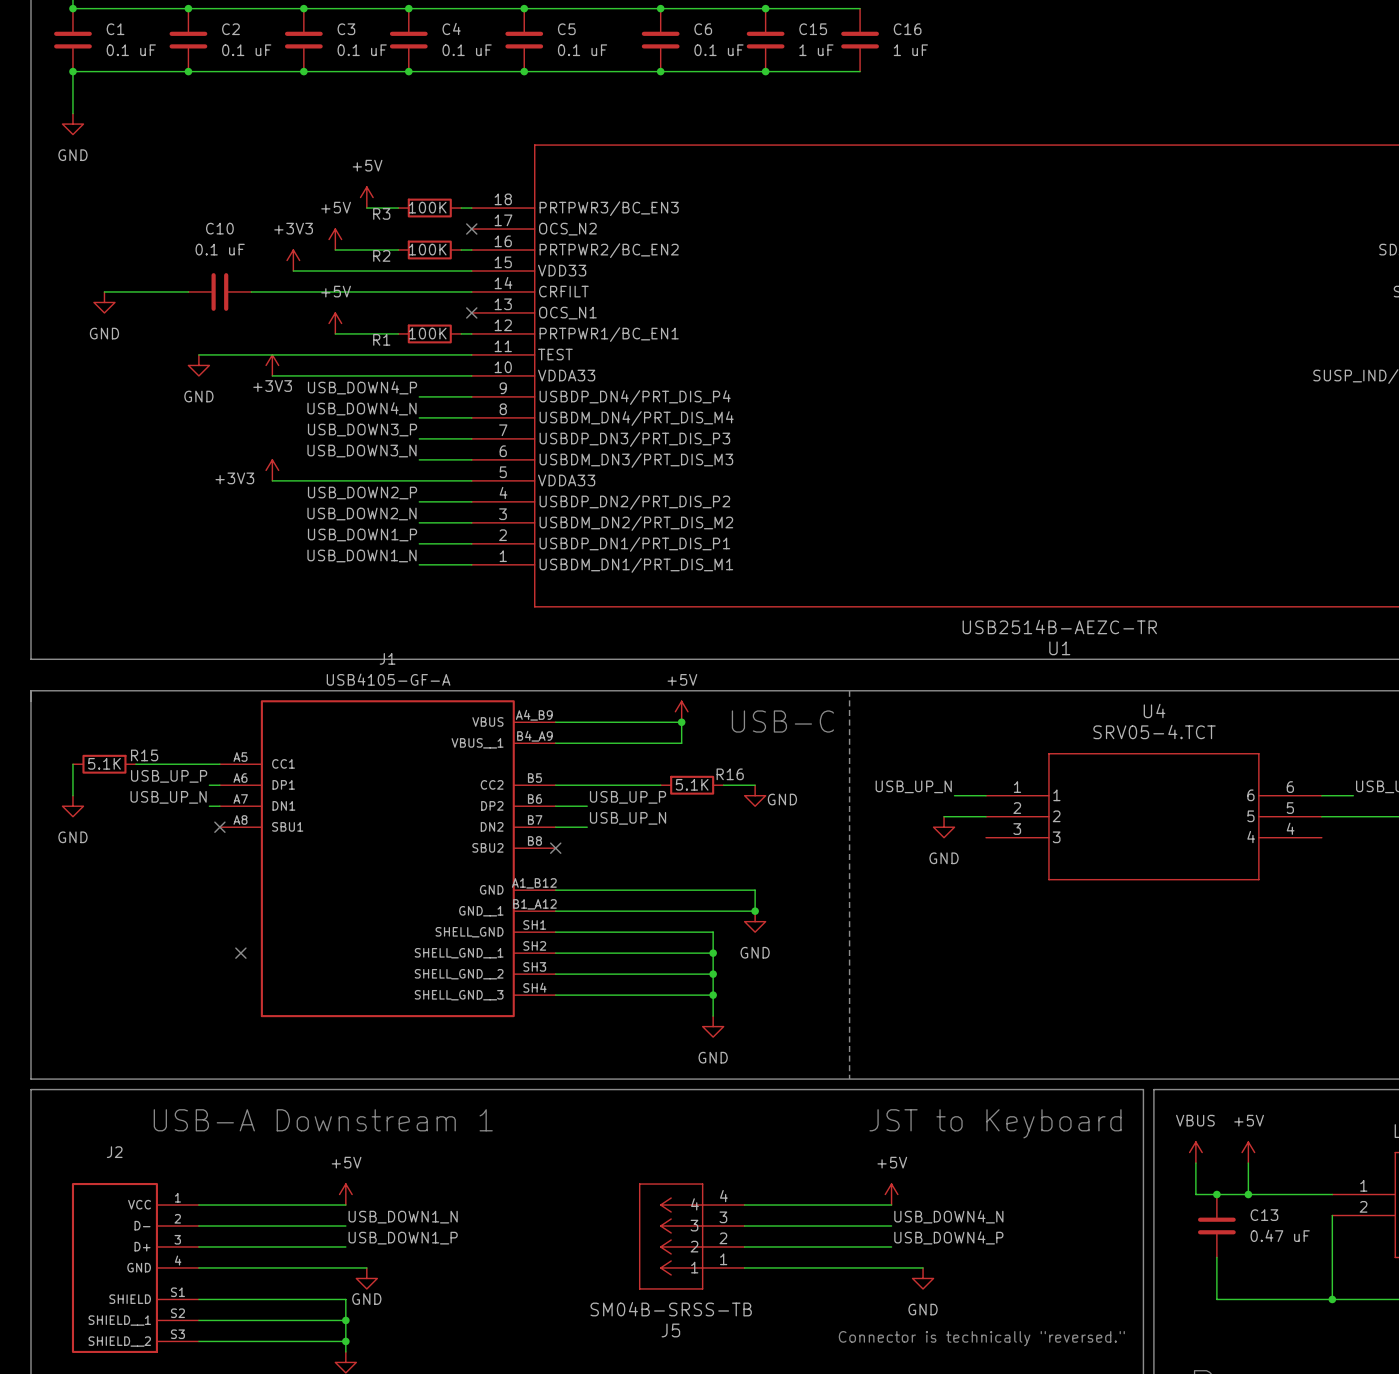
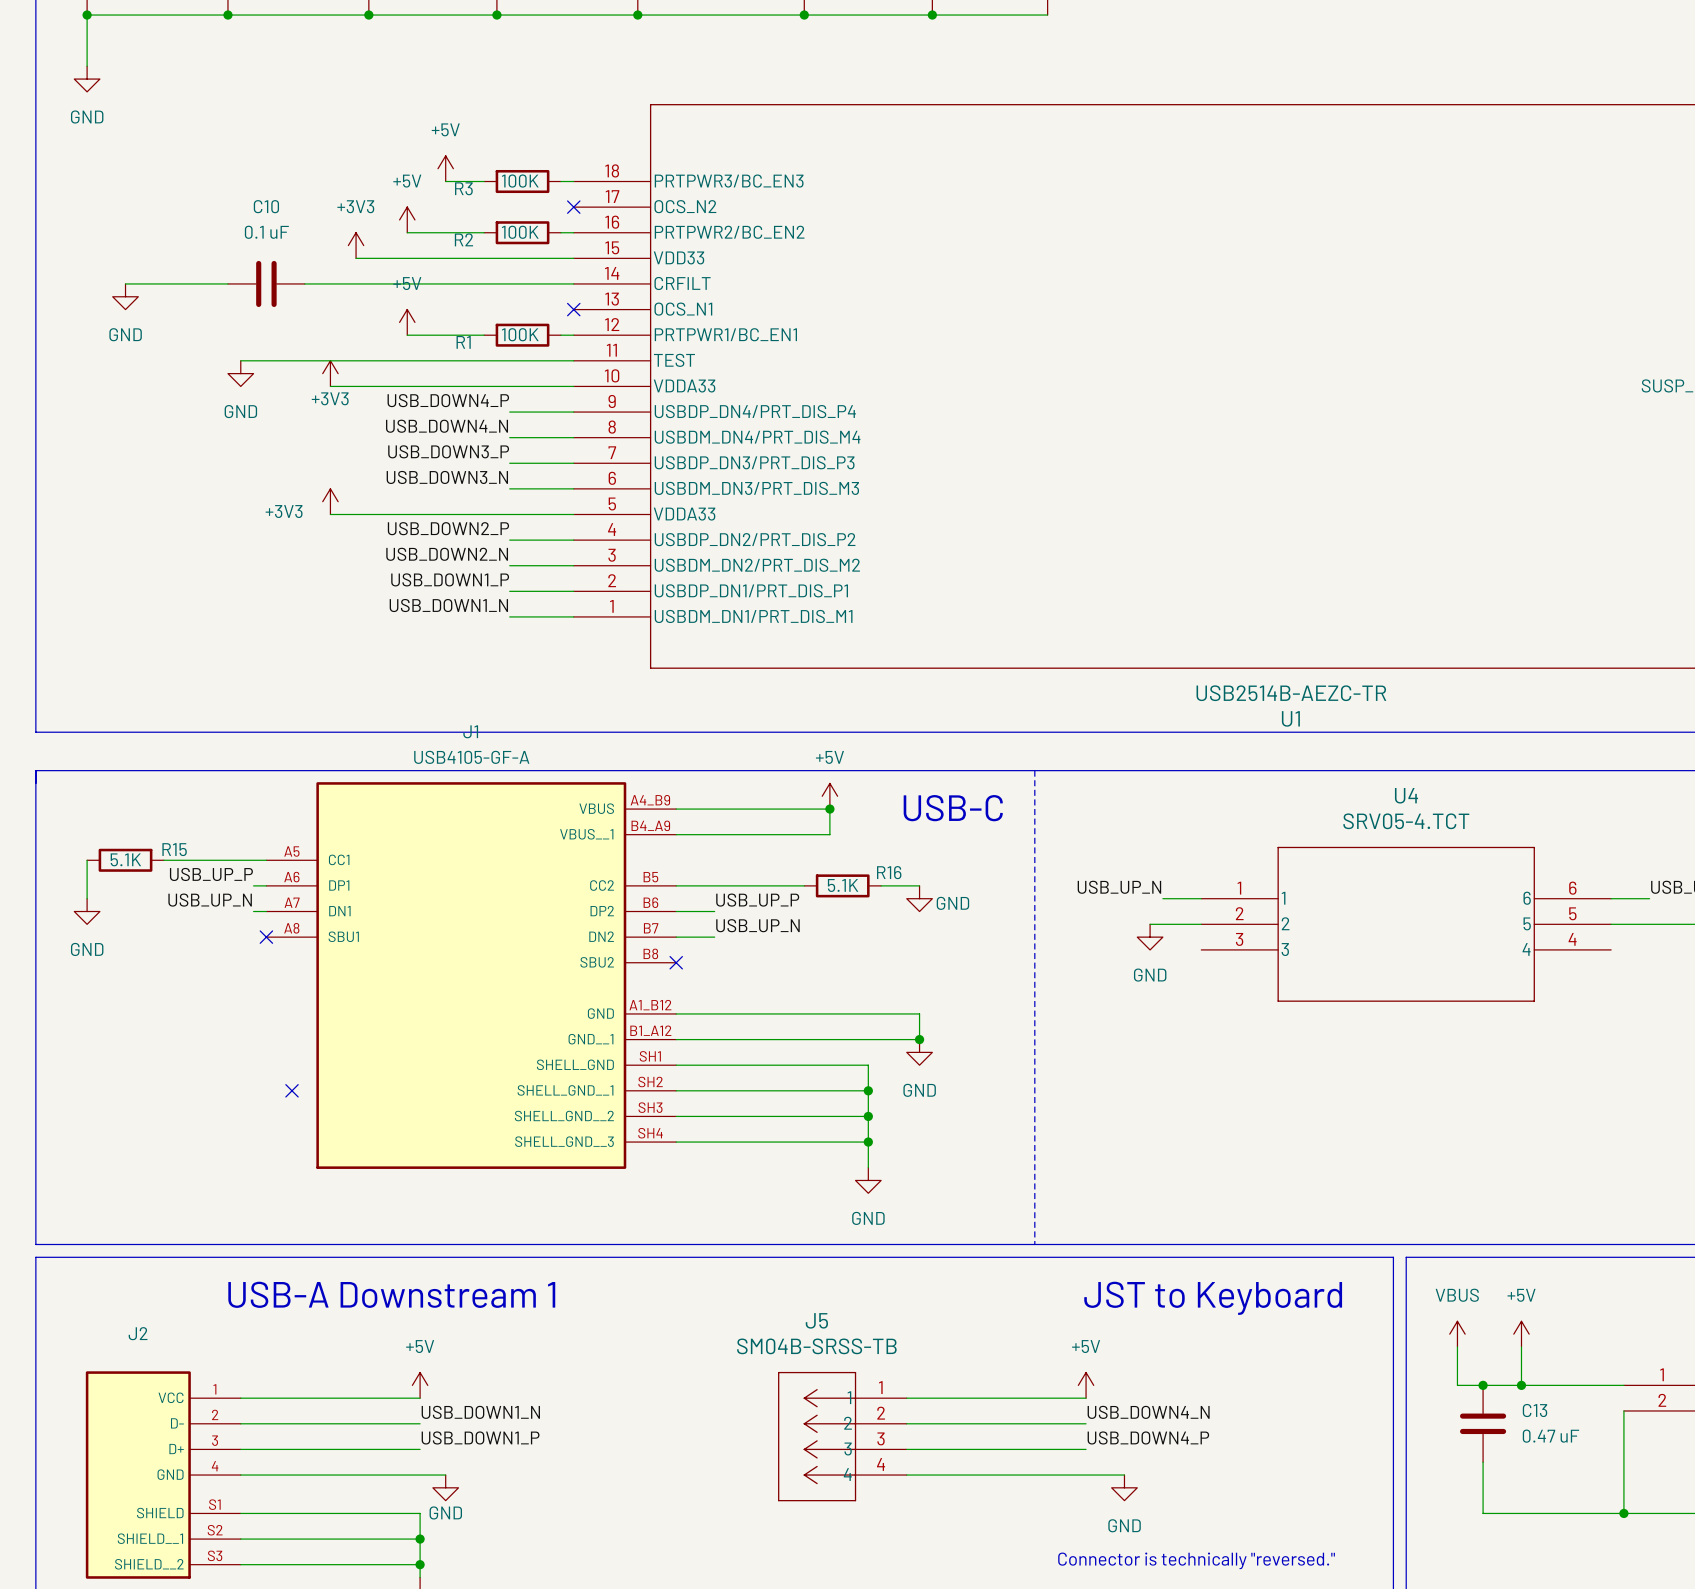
J5 flip: as is (671, 1236) -> up-down (817, 1436)

